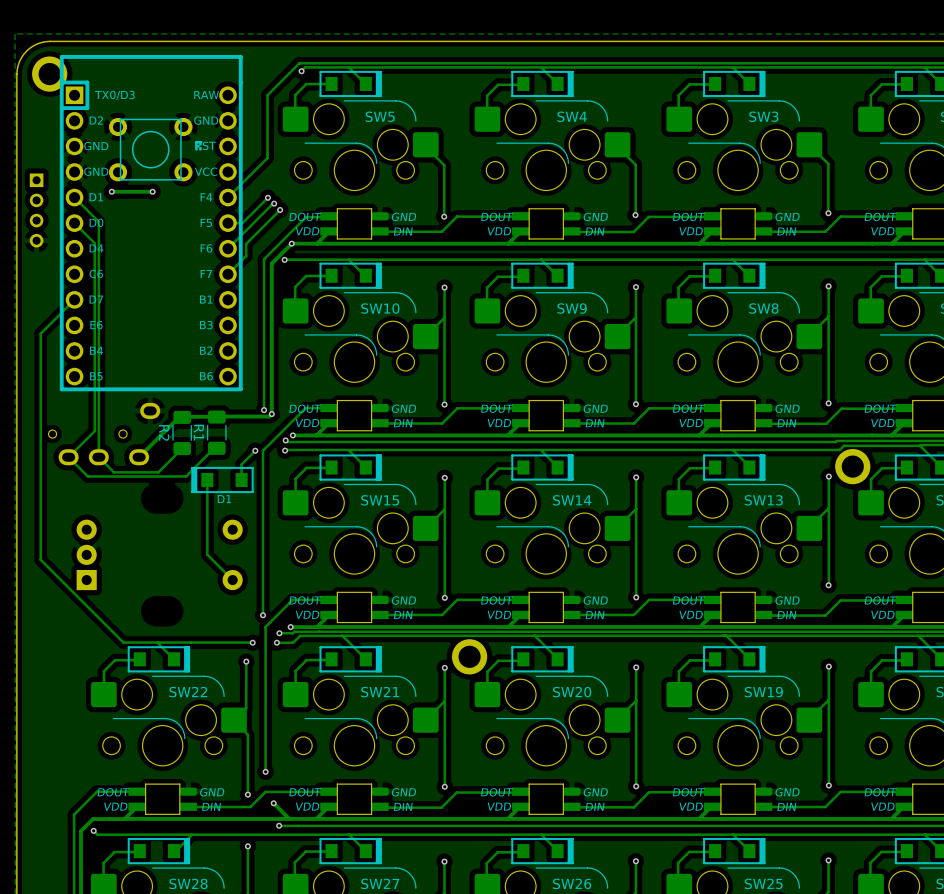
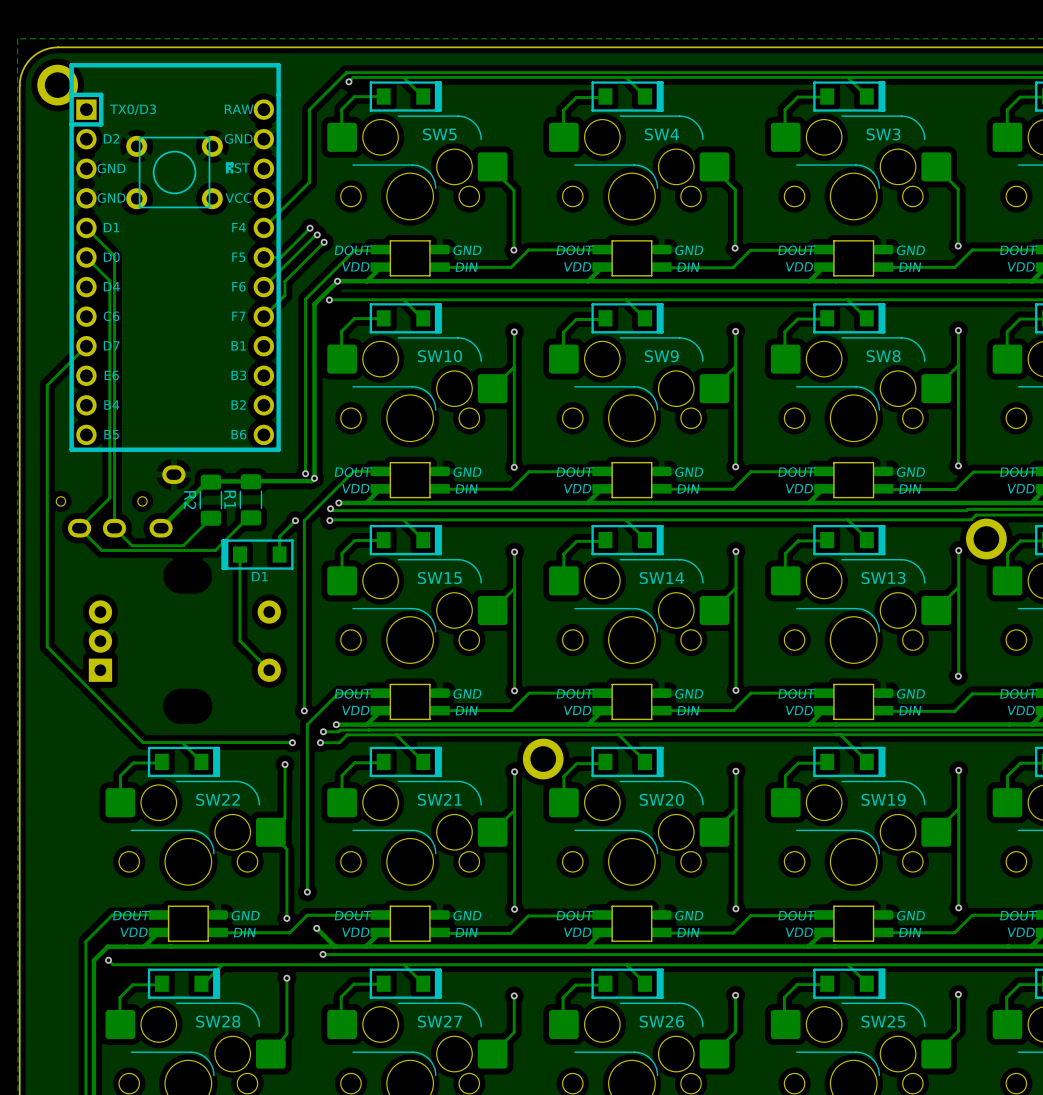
via: (111, 191) -> none
track: (152, 191) (111, 191) -> none
via: (152, 191) -> none
part: (36, 210) -> none

